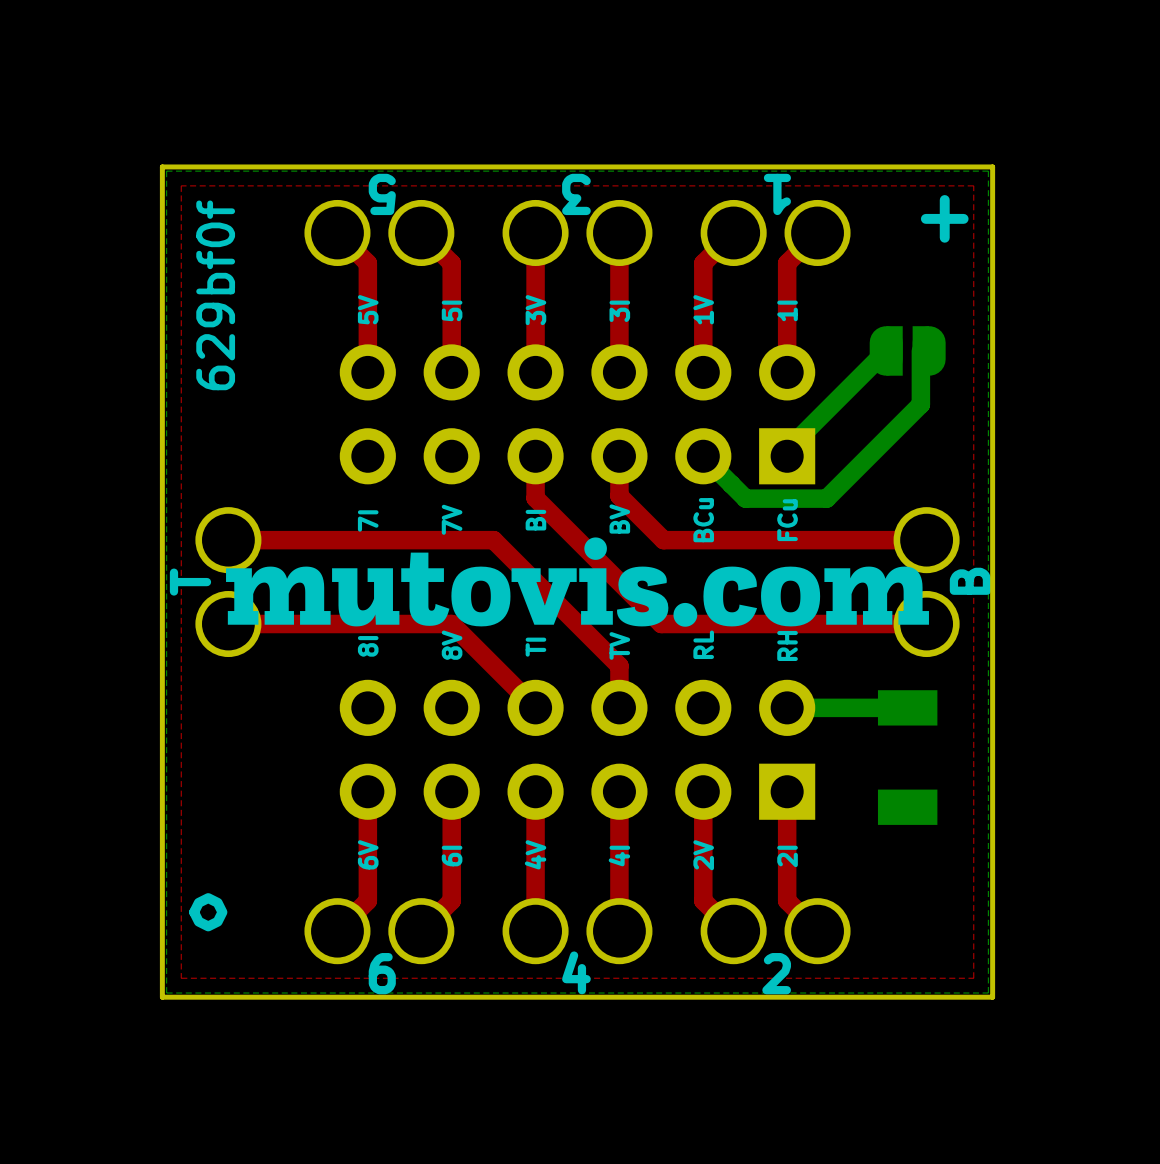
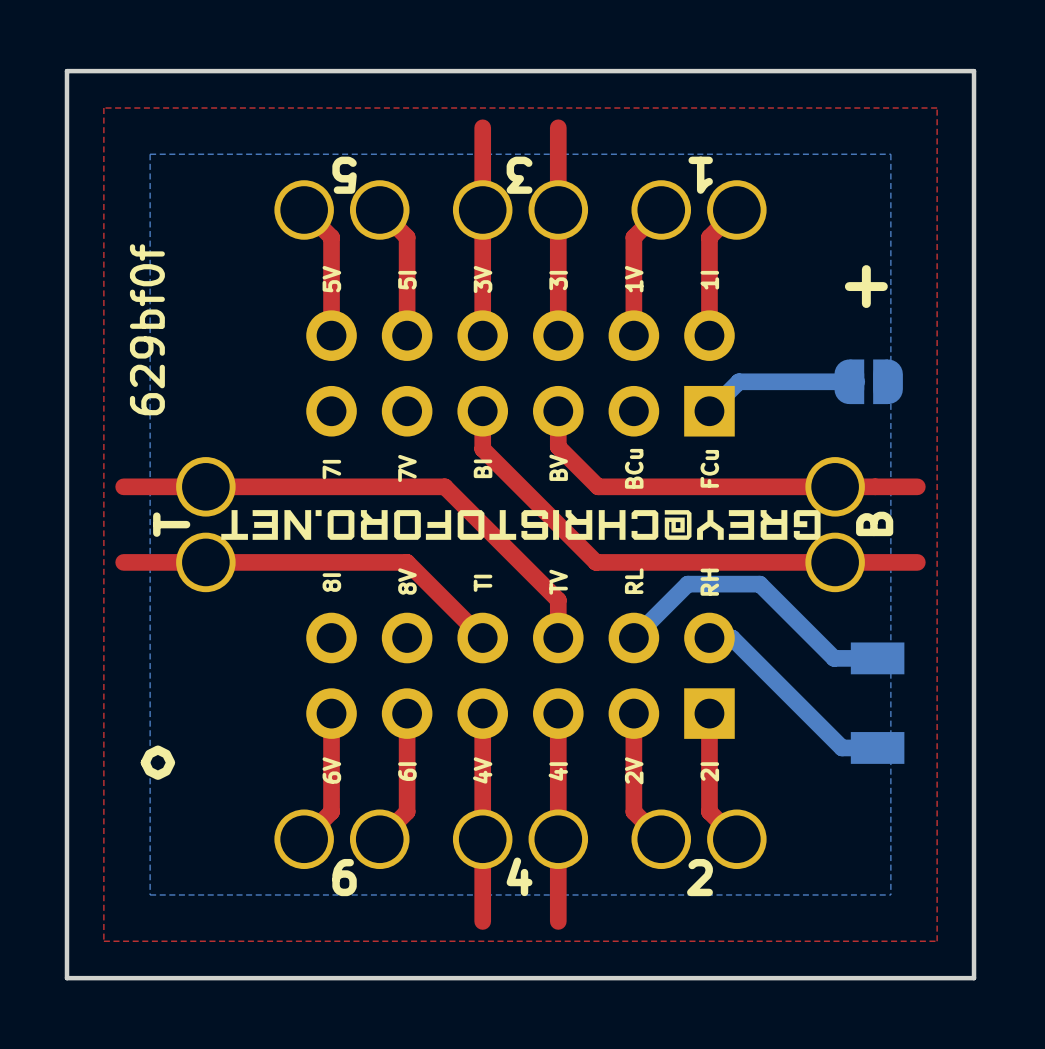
top track: none -> (482, 127) (482, 209)
top track: none -> (558, 127) (558, 209)
board edge: (162, 166) (992, 166) (992, 997) (162, 997) (162, 166) -> (66, 71) (66, 978) (974, 978) (974, 71) (66, 71)
top zone outline: (181, 185) (973, 185) (973, 978) (181, 978) (181, 185) -> (103, 108) (103, 941) (937, 941) (937, 108) (103, 108)
text position: + (944, 218) -> + (866, 286)
text position: 629bf0f (215, 295) -> 629bf0f (147, 329)
bottom track: (886, 350) (787, 450) (787, 456) -> (856, 381) (738, 381) (709, 411)
part position: (907, 350) -> (868, 381)
bottom track: (920, 350) (920, 404) (826, 498) (745, 498) (703, 456) -> none
drawing shape: [226, 537, 929, 627] -> [221, 510, 821, 540]
top track: none -> (123, 486) (205, 486)
top track: none -> (835, 486) (917, 486)
top track: none -> (123, 562) (205, 562)
top track: none -> (835, 562) (917, 562)
bottom track: none -> (633, 638) (687, 584) (759, 584) (834, 658) (877, 658)
bottom track: (812, 707) (907, 707) -> (732, 638) (842, 747) (877, 747)
part position: (907, 757) -> (877, 703)
text position: ° (208, 912) -> ° (157, 762)
top track: none -> (482, 839) (482, 921)
top track: none -> (558, 839) (558, 921)

